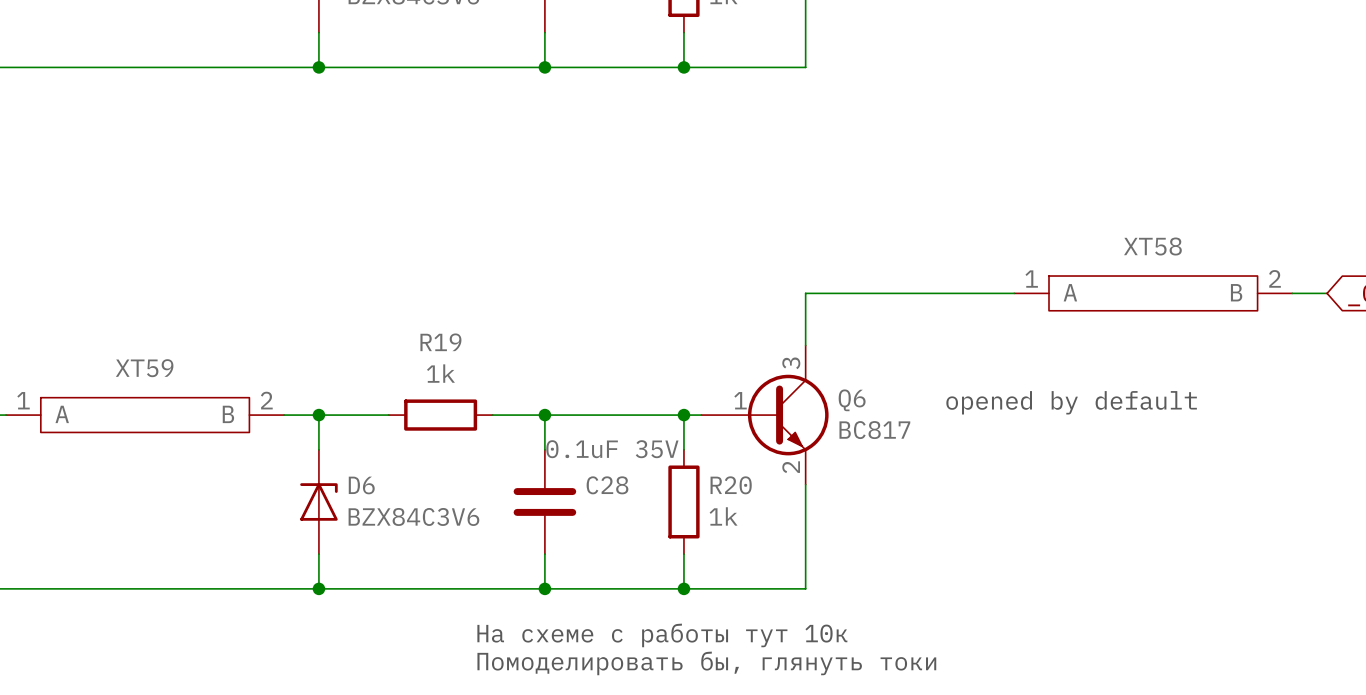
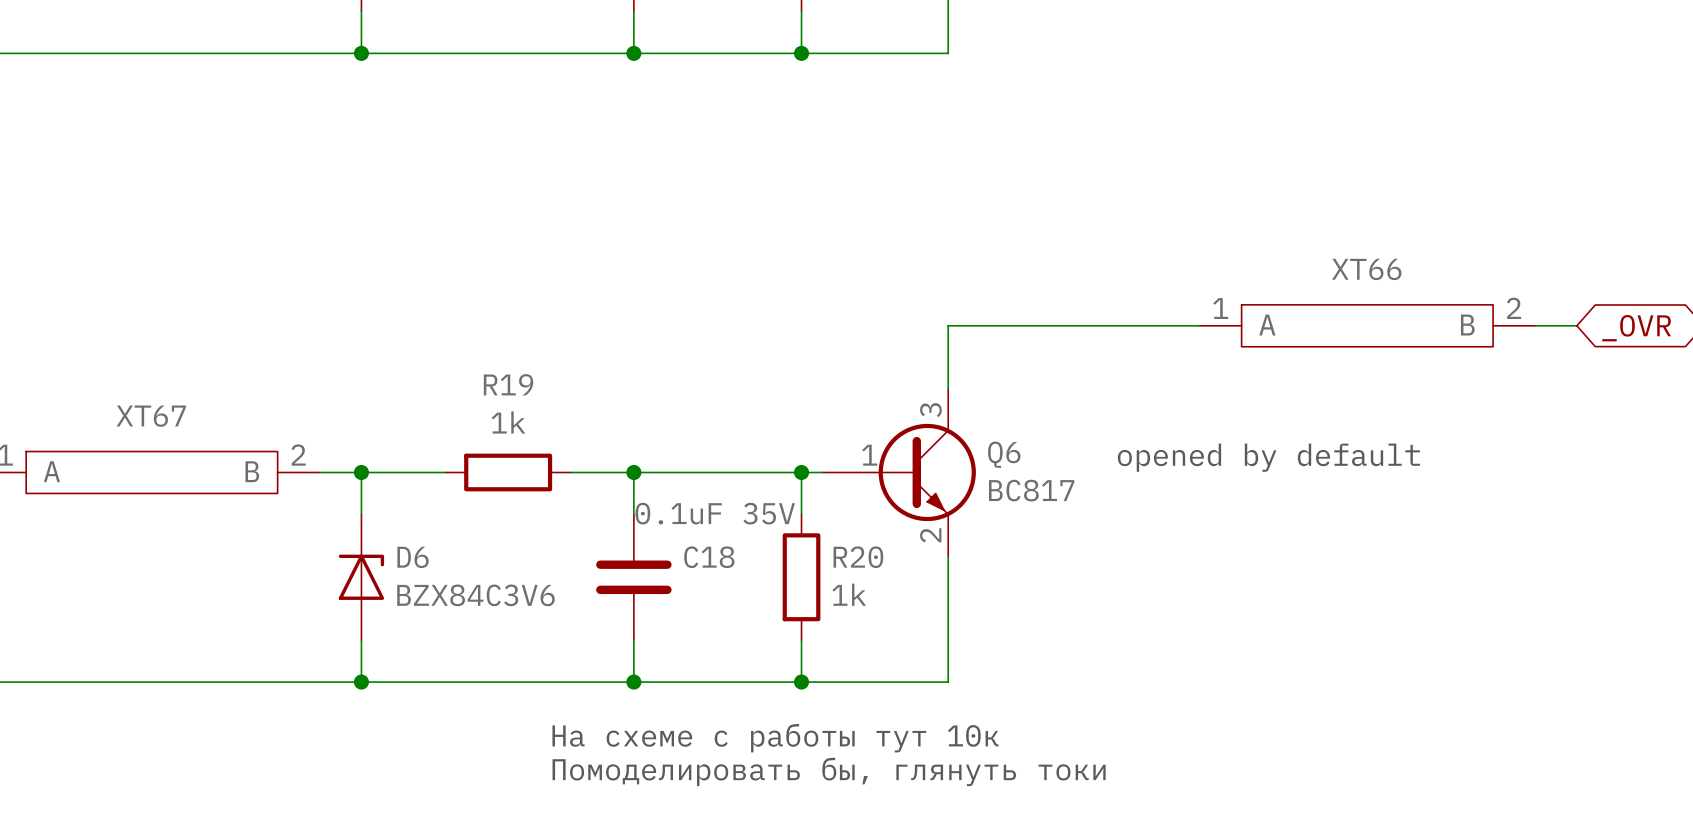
XT58 name: XT58 (1152, 246) -> XT66 (1366, 269)
XT59 name: XT59 (144, 368) -> XT67 (151, 416)
C28 name: C28 (607, 485) -> C18 (709, 557)

